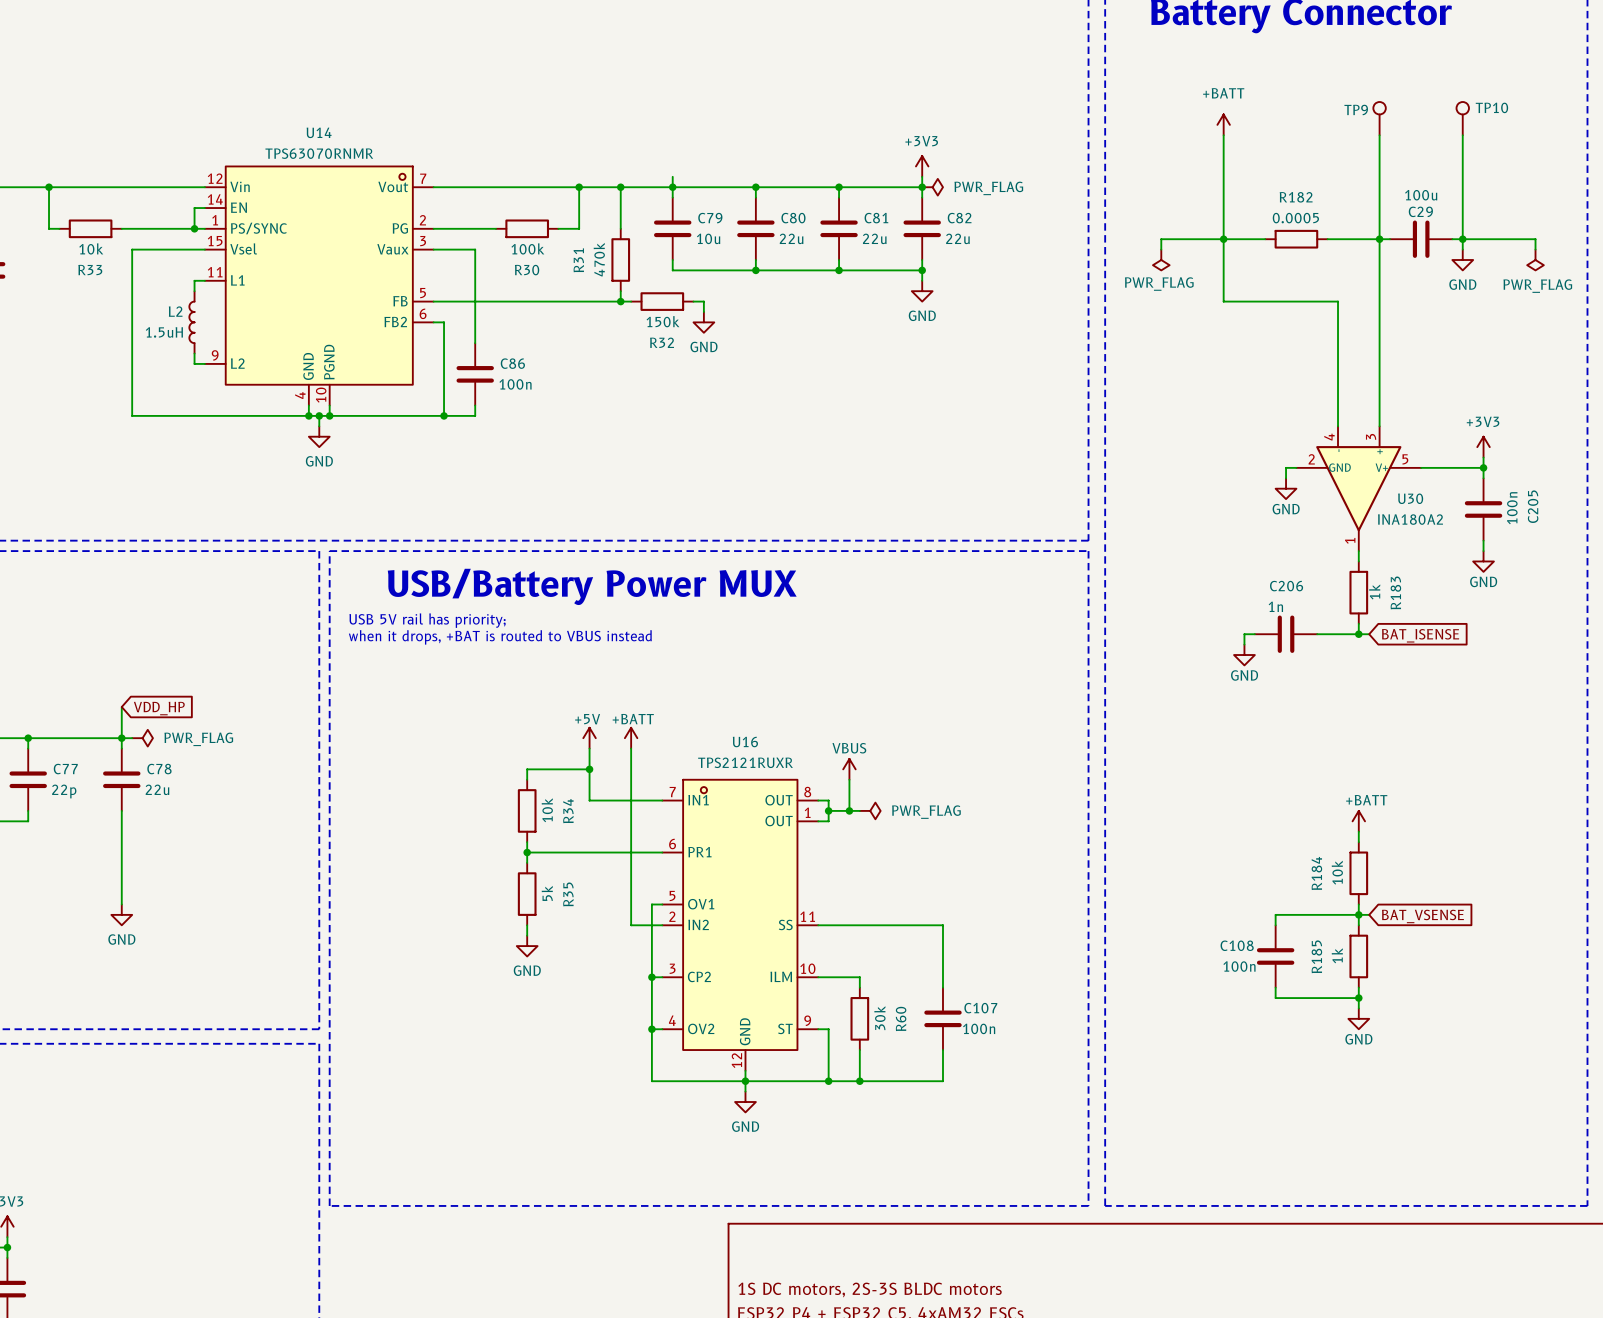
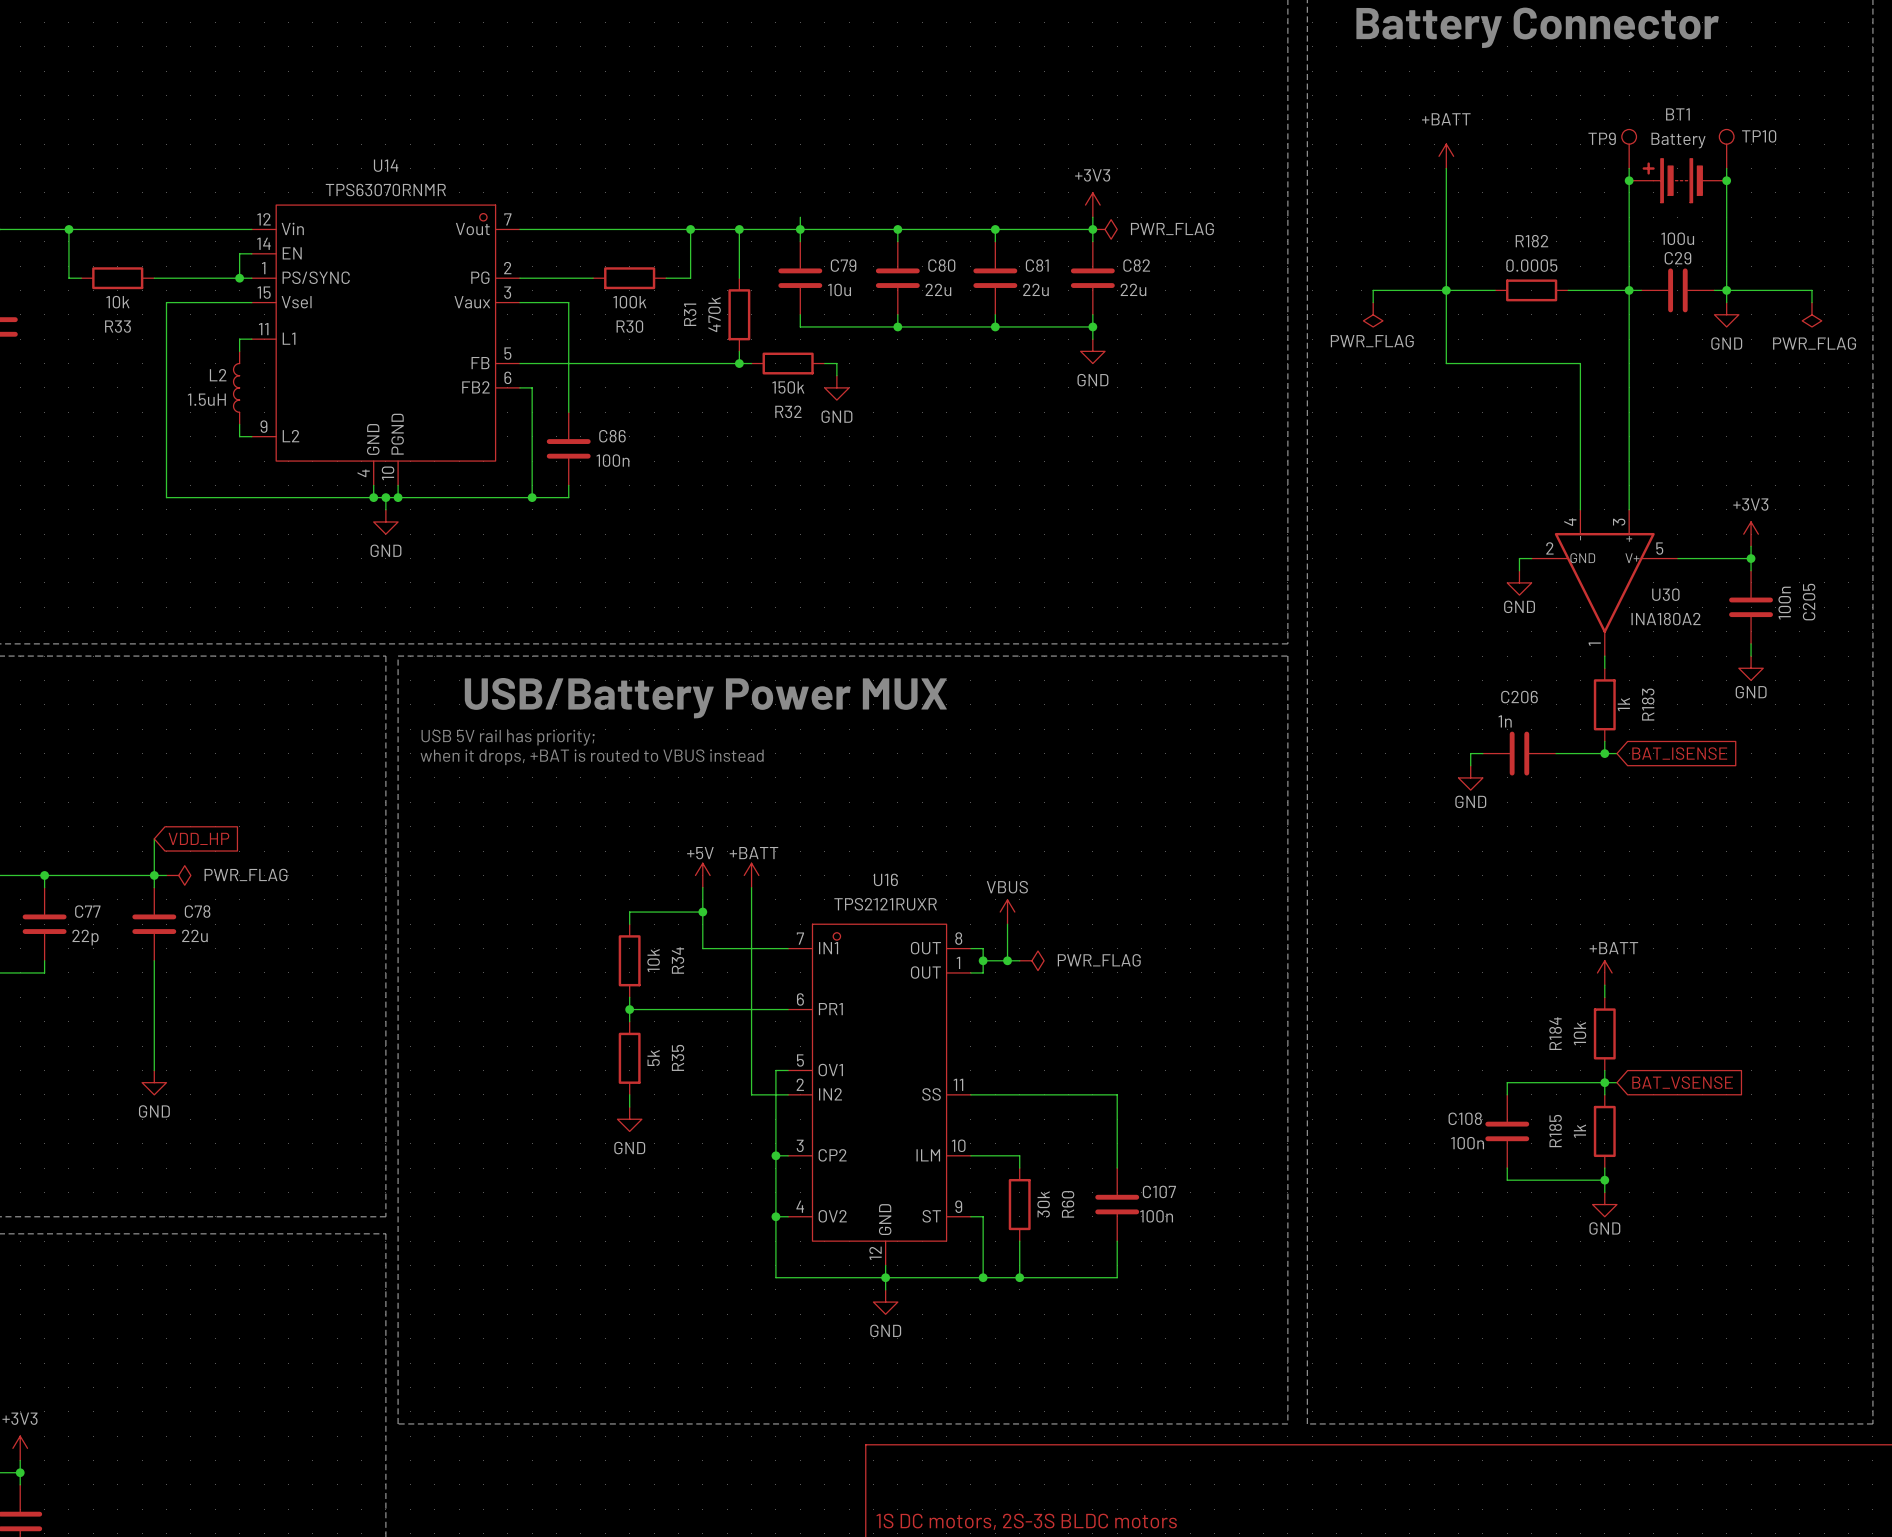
junction: none -> (1629, 180)
BT1: none -> Battery (1677, 180)
junction: none -> (1726, 180)

